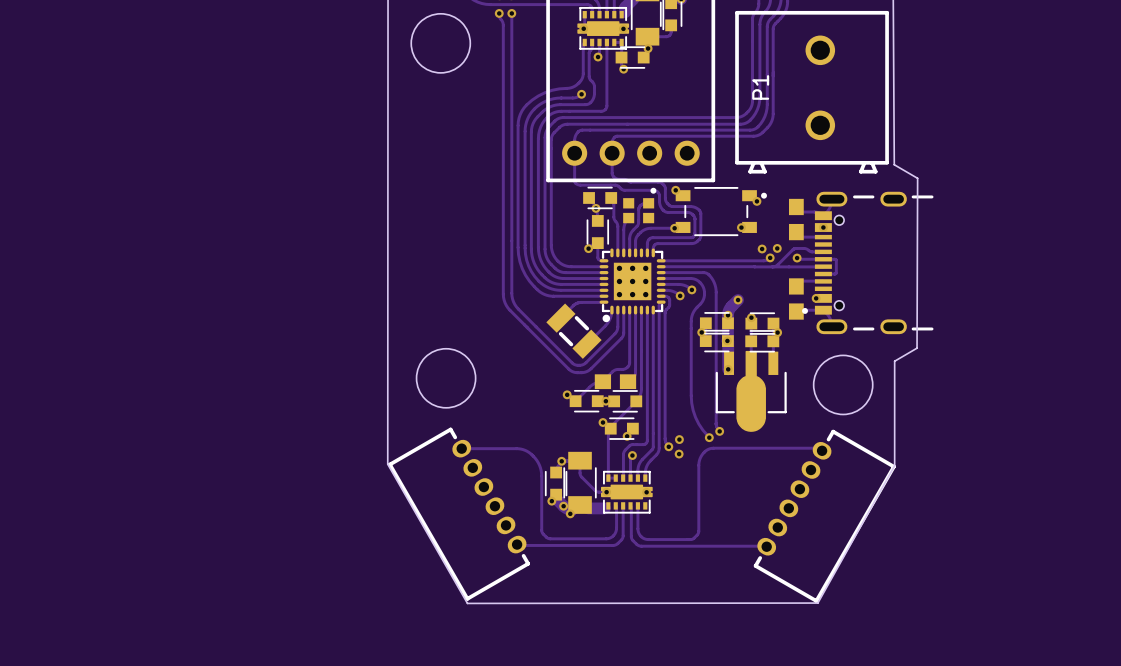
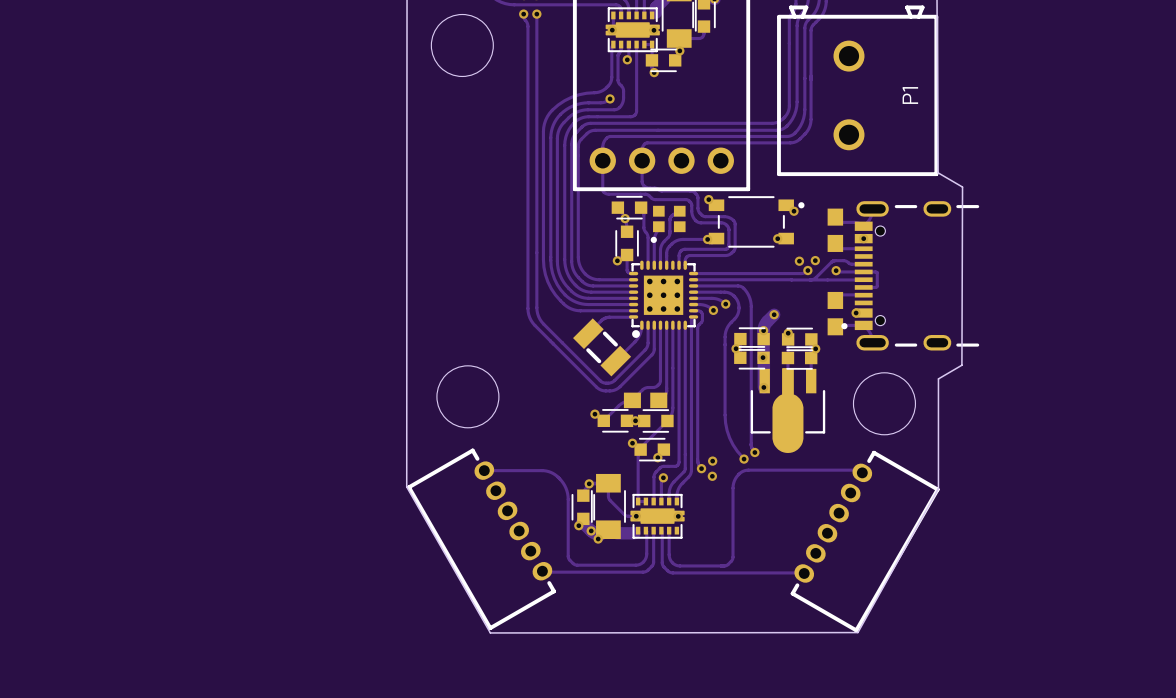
P1 rotation: 0° (812, 92) -> 180° (857, 90)
part rotation: 0° (639, 205) -> 180° (668, 224)

